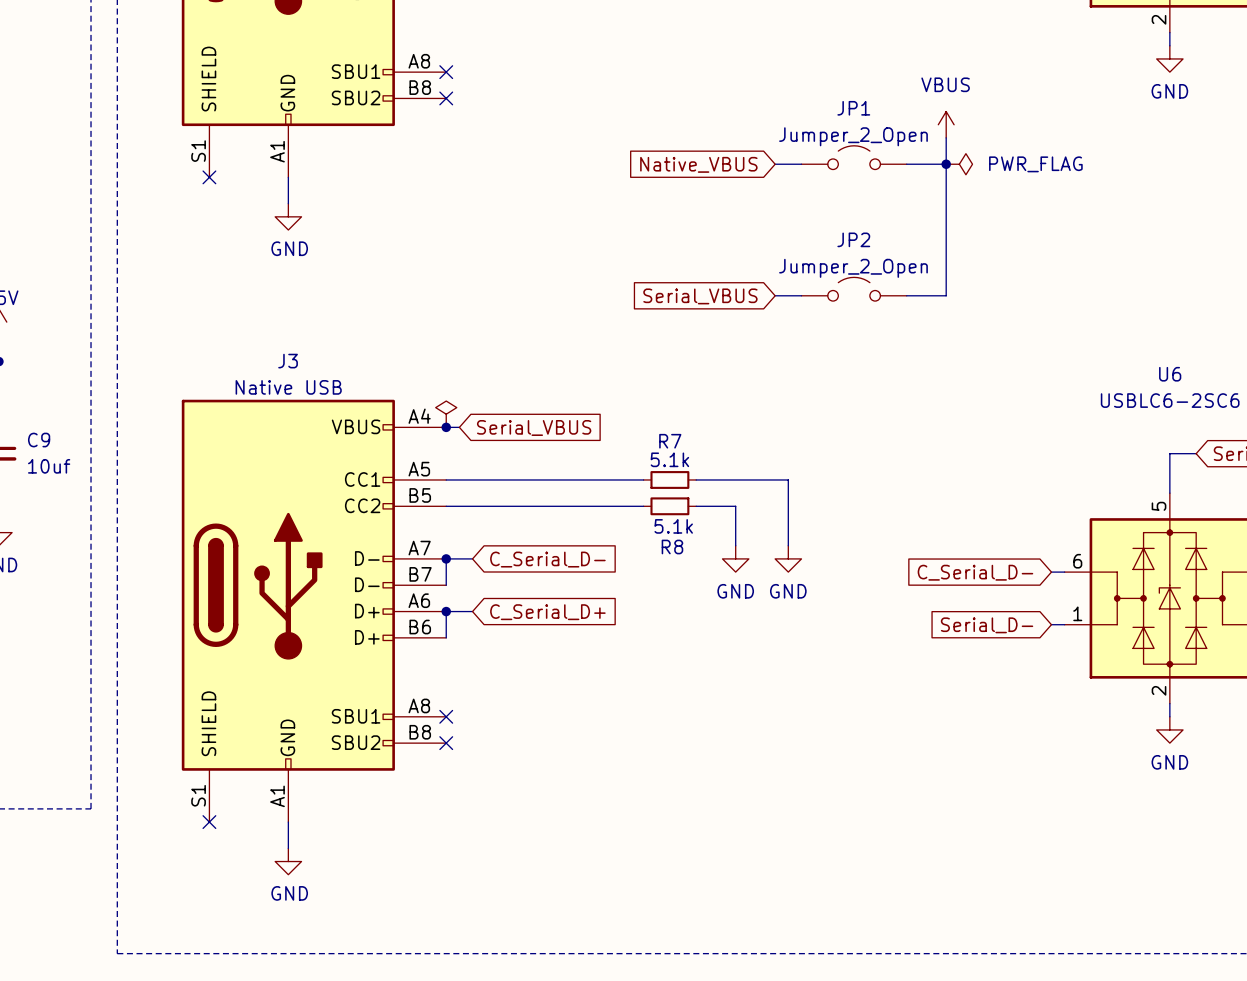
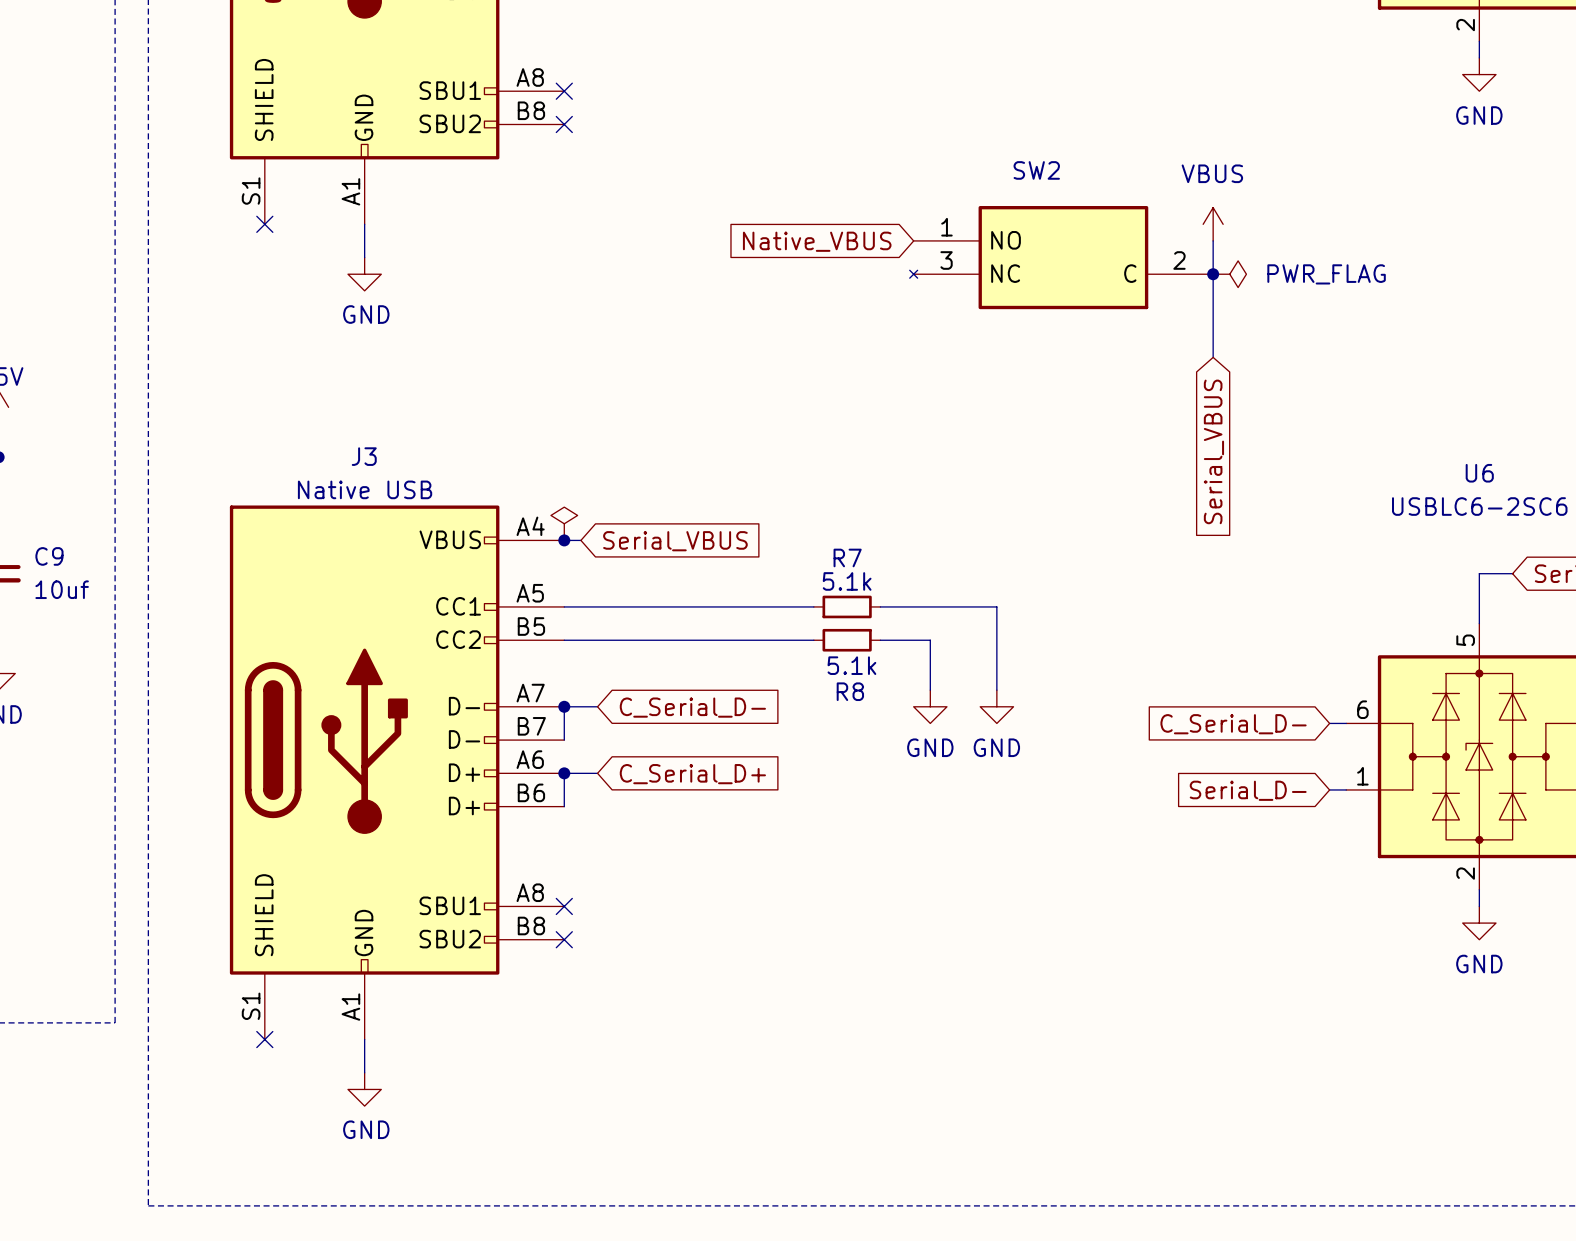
power symbol position: VBUS (946, 124) -> VBUS (1213, 224)
wire: (946, 137) (946, 295) (906, 295) -> none
JP1: Jumper_2_Open (854, 157) -> none
global label position: Native_VBUS (698, 164) -> Native_VBUS (817, 241)
wire: (906, 164) (946, 164) -> none
junction position: (946, 164) -> (1213, 274)
power symbol position: PWR_FLAG (959, 164) -> PWR_FLAG (1229, 274)
wire: none -> (1213, 240) (1213, 357)
SW2: none -> (1061, 257)
JP2: Jumper_2_Open (854, 289) -> none
wire: (775, 295) (801, 295) -> none
global label rotation: 0° (700, 296) -> 90° counterclockwise (1213, 451)
global label position: Serial_VBUS (700, 296) -> Serial_VBUS (1213, 451)

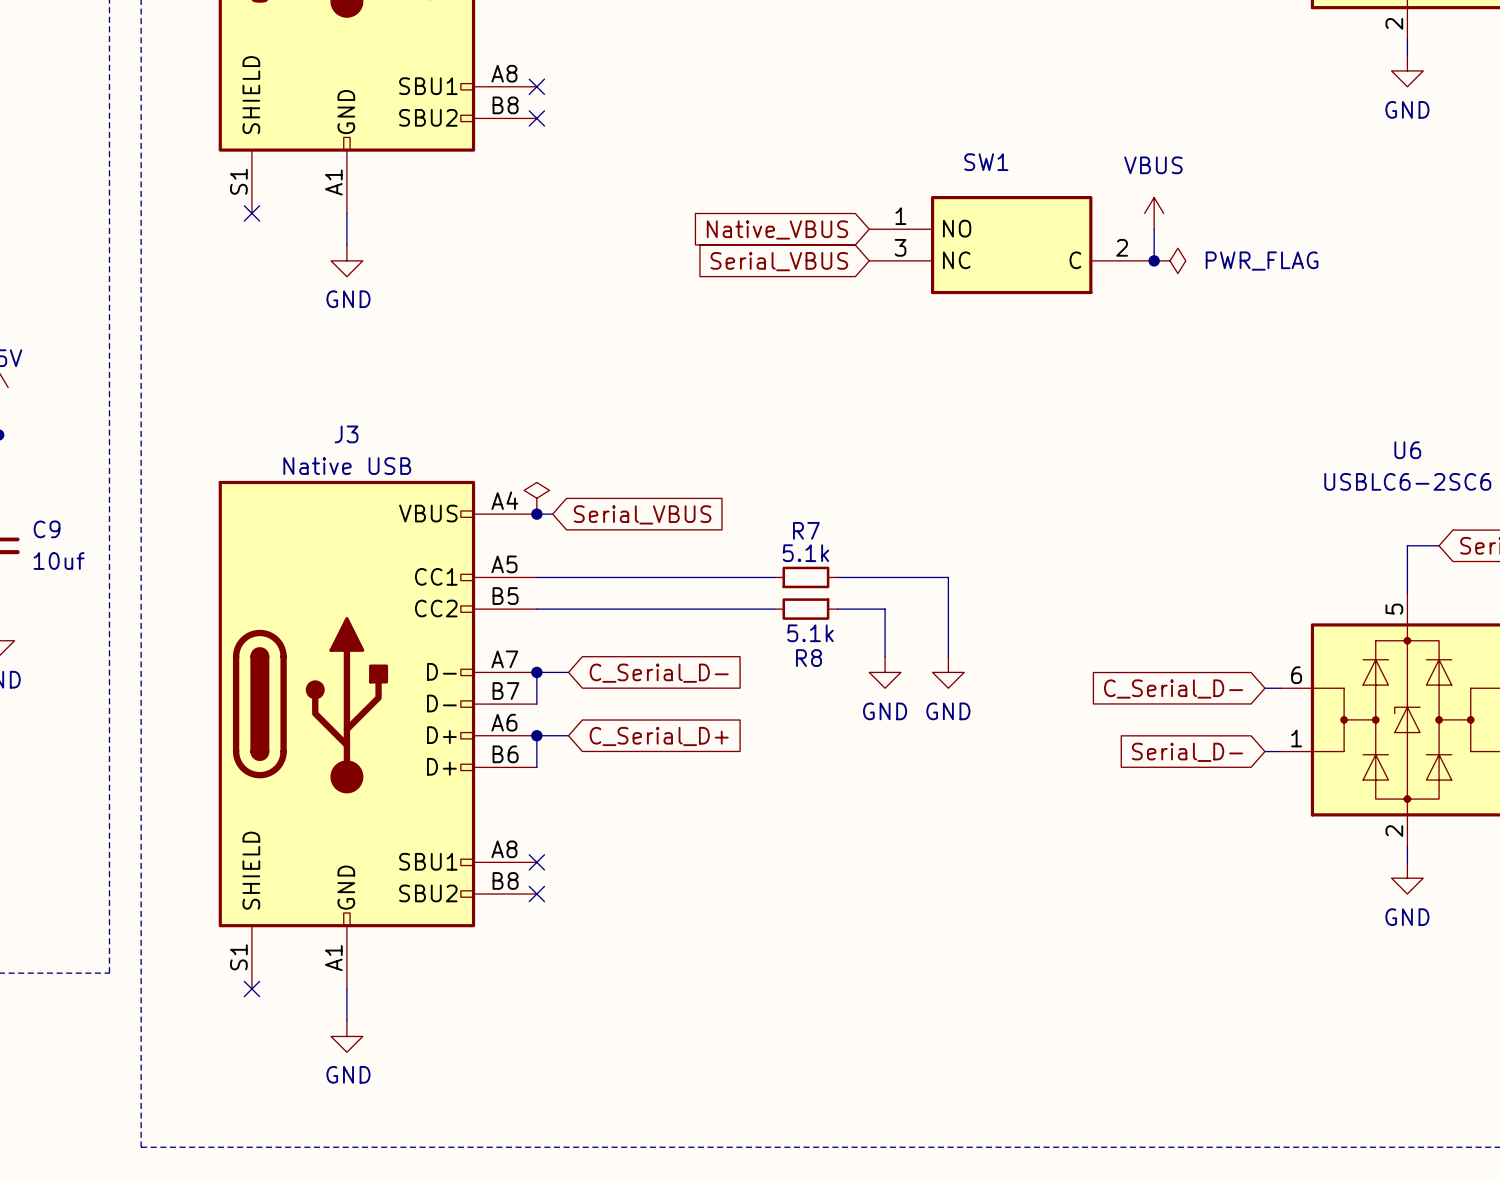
SW2: (1061, 257) -> none
SW1: none -> (1011, 245)
wire: (1213, 274) (1213, 357) -> none
global label rotation: 0° (1213, 451) -> 90° clockwise (779, 261)
global label position: Serial_VBUS (1213, 451) -> Serial_VBUS (779, 261)

